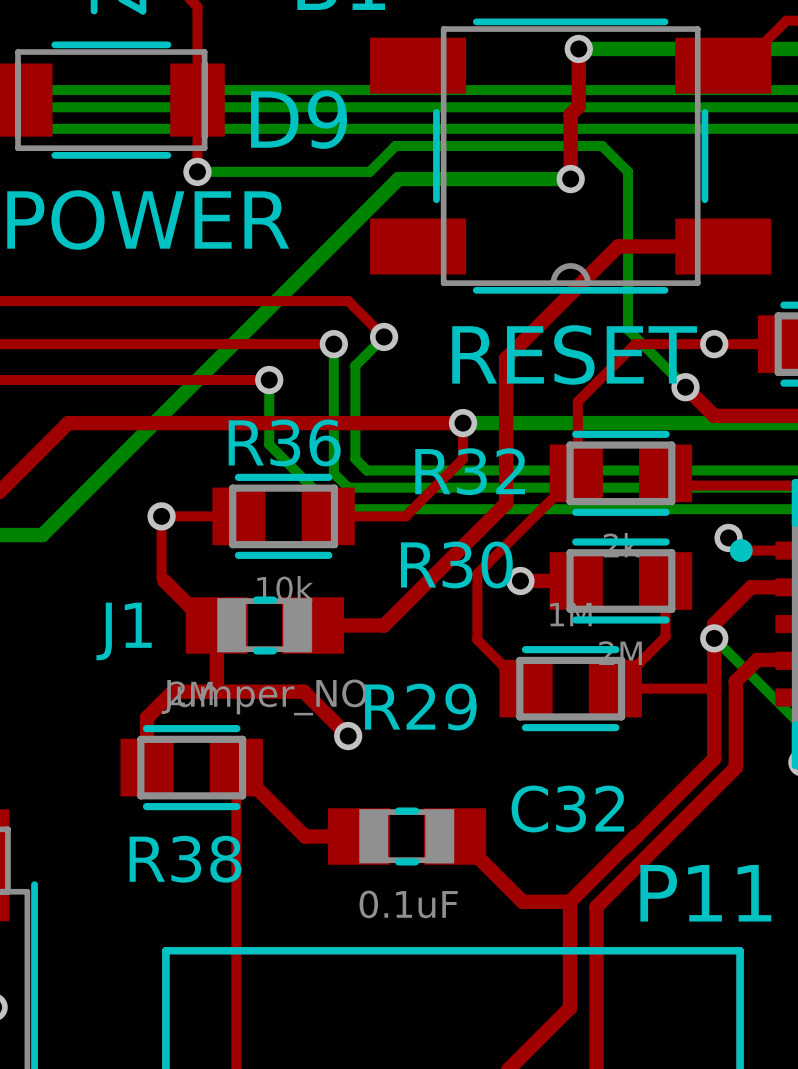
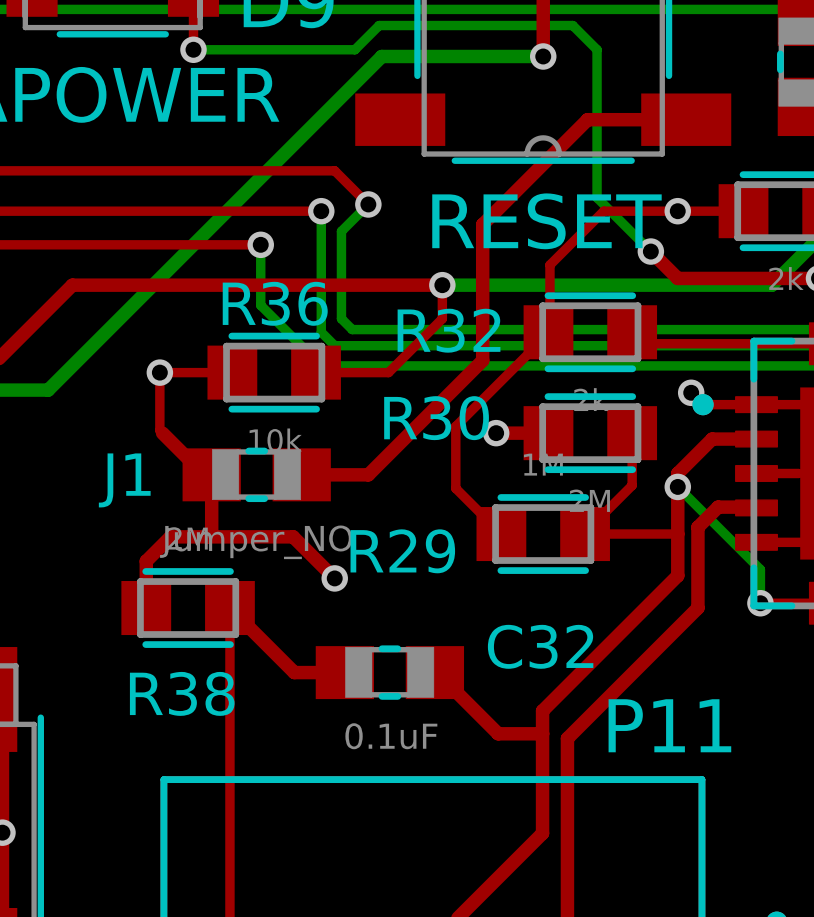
top track: (714, 733) (714, 758) (626, 846) -> (677, 575) (542, 710) (542, 733)
top track: (636, 836) (569, 901) -> none

